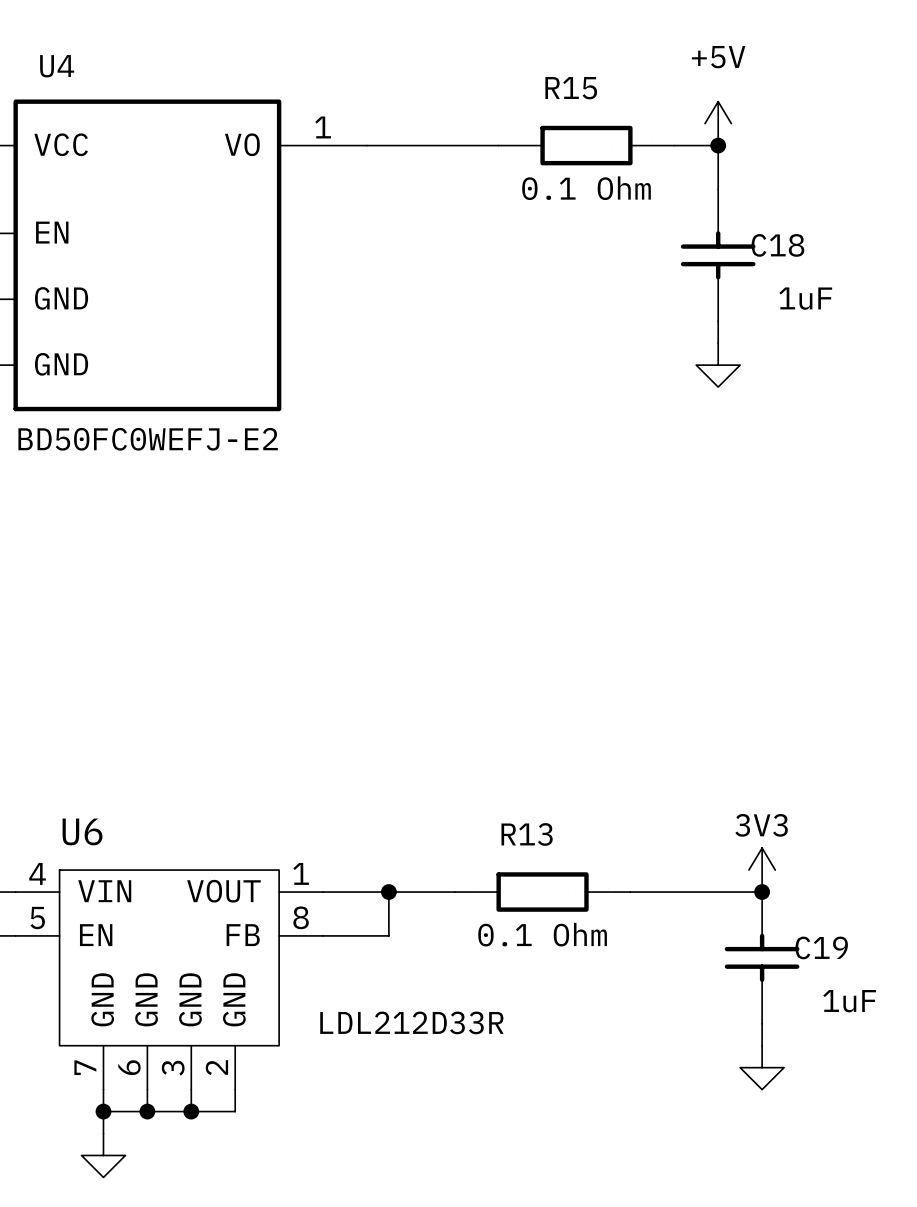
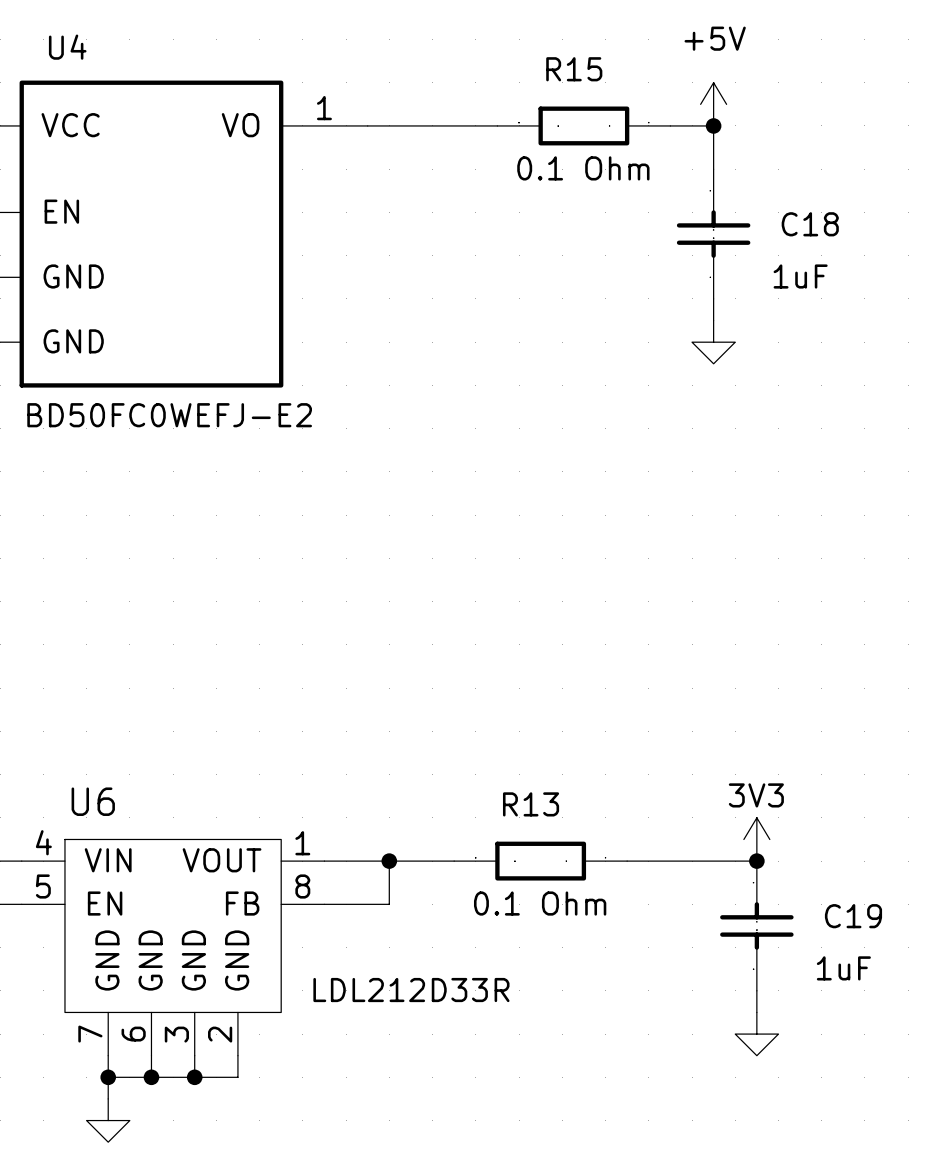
C18 name position: C18 (777, 245) -> C18 (810, 224)
C19 name position: C19 (821, 947) -> C19 (853, 916)

